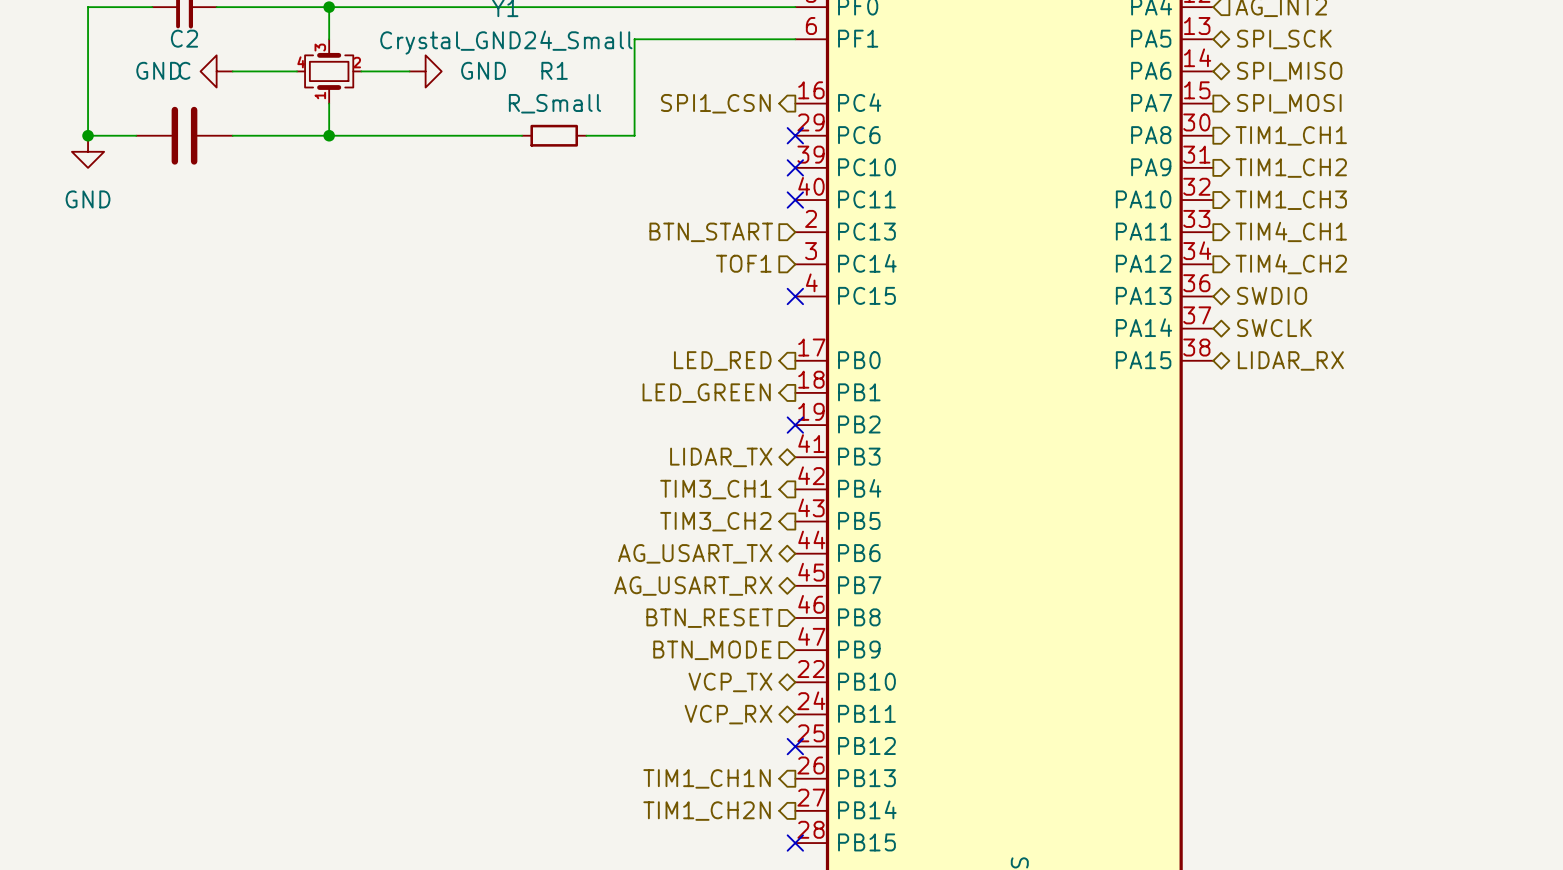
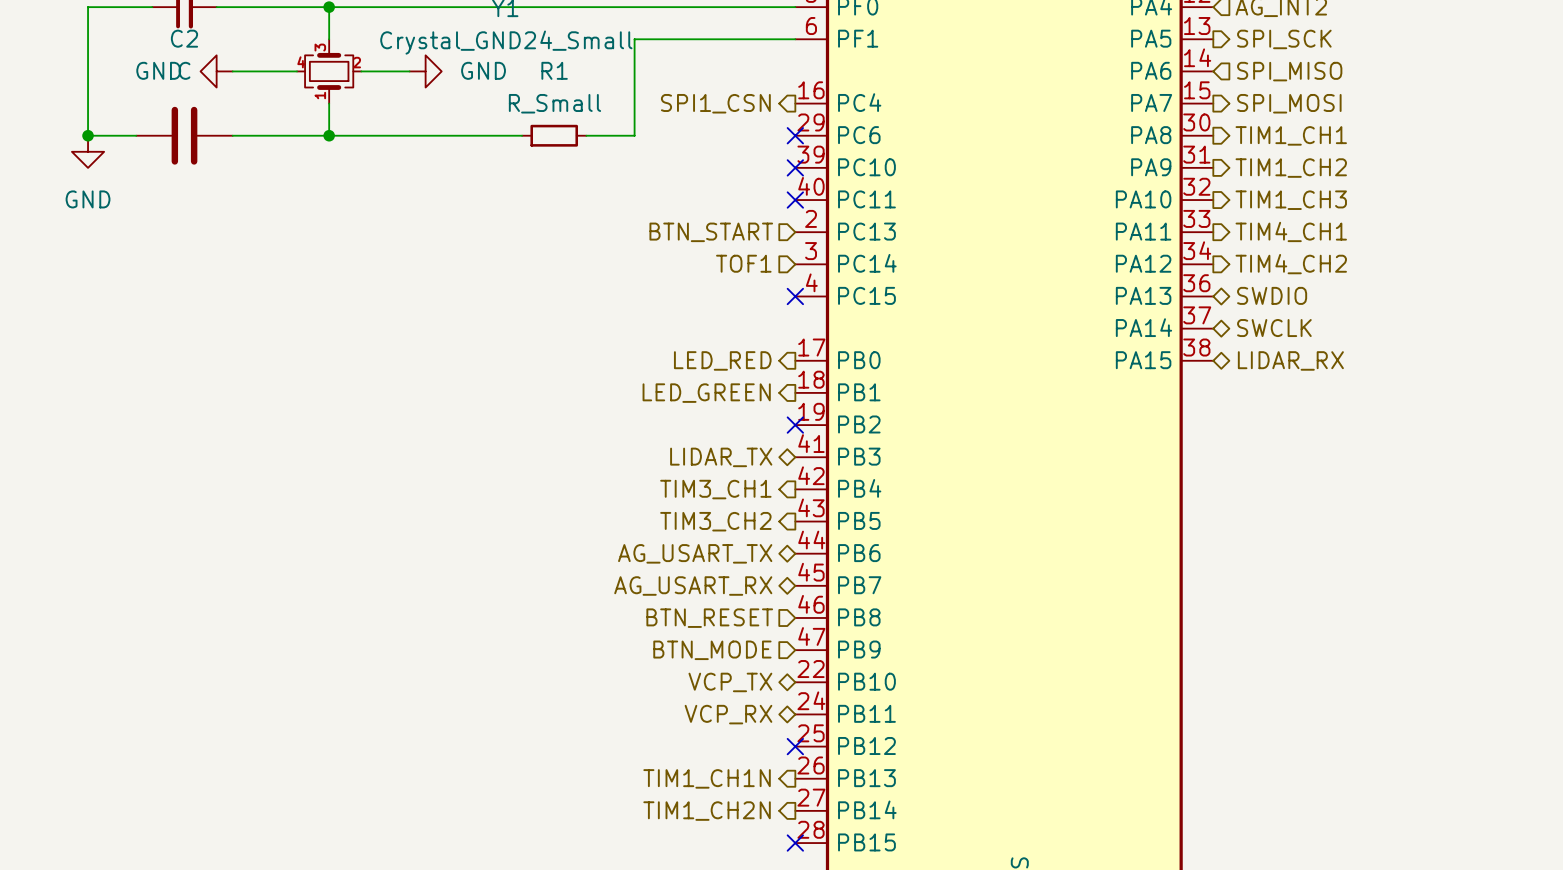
hierarchical label shape: bidirectional (1284, 39) -> output (1284, 39)
hierarchical label shape: bidirectional (1289, 71) -> input (1289, 71)

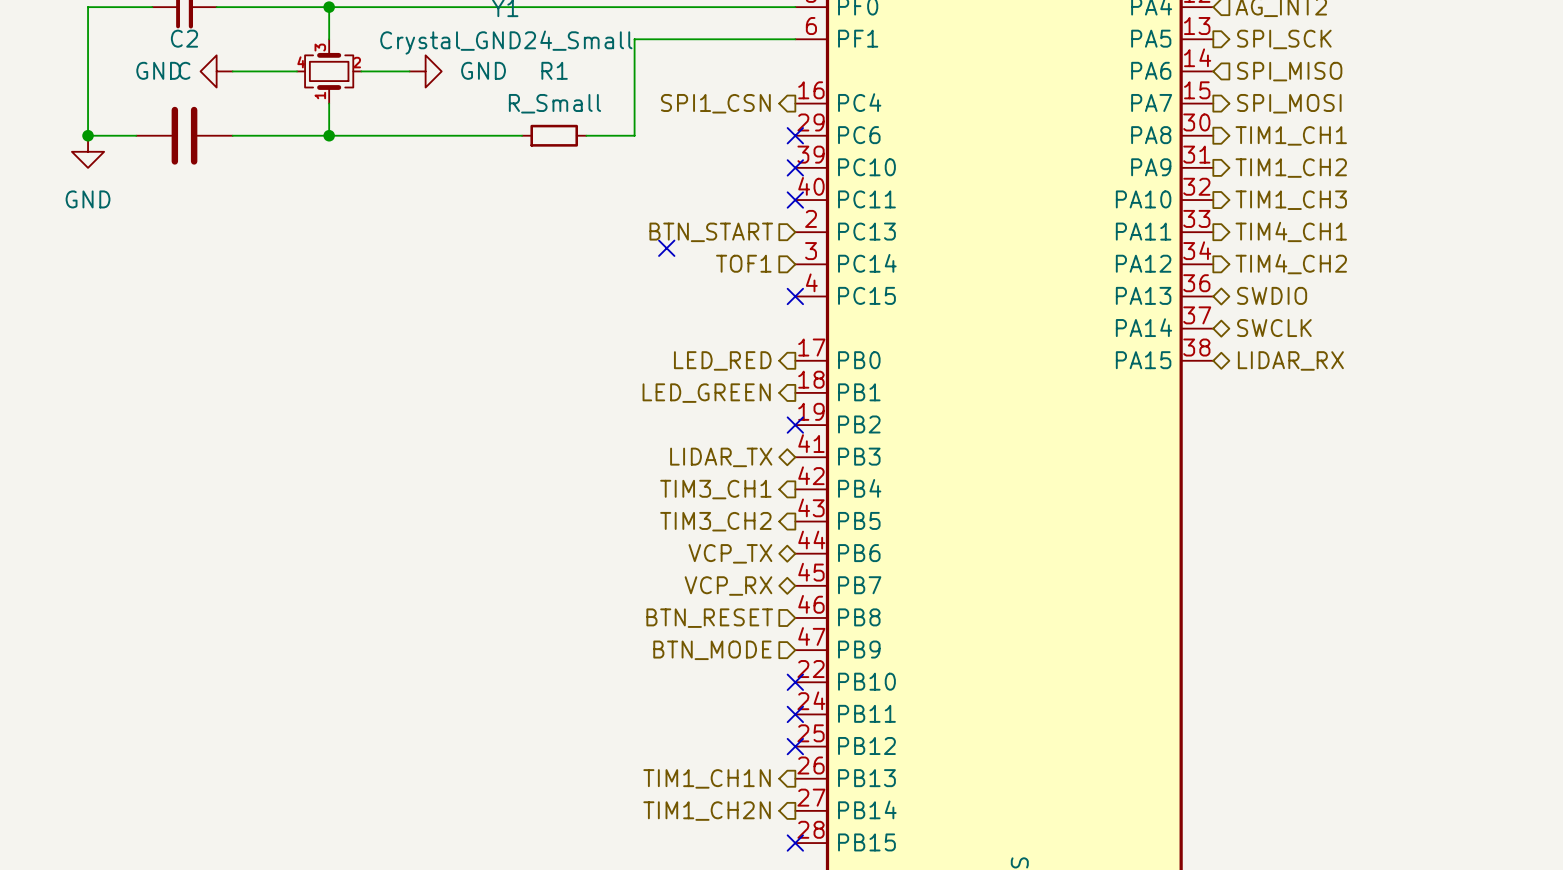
no-connect mark: none -> (666, 248)
hierarchical label: AG_USART_TX (695, 553) -> VCP_TX (730, 553)
hierarchical label: AG_USART_RX (693, 586) -> VCP_RX (728, 586)
hierarchical label: VCP_TX (730, 682) -> none
no-connect mark: none -> (795, 682)
hierarchical label: VCP_RX (728, 714) -> none
no-connect mark: none -> (795, 714)

